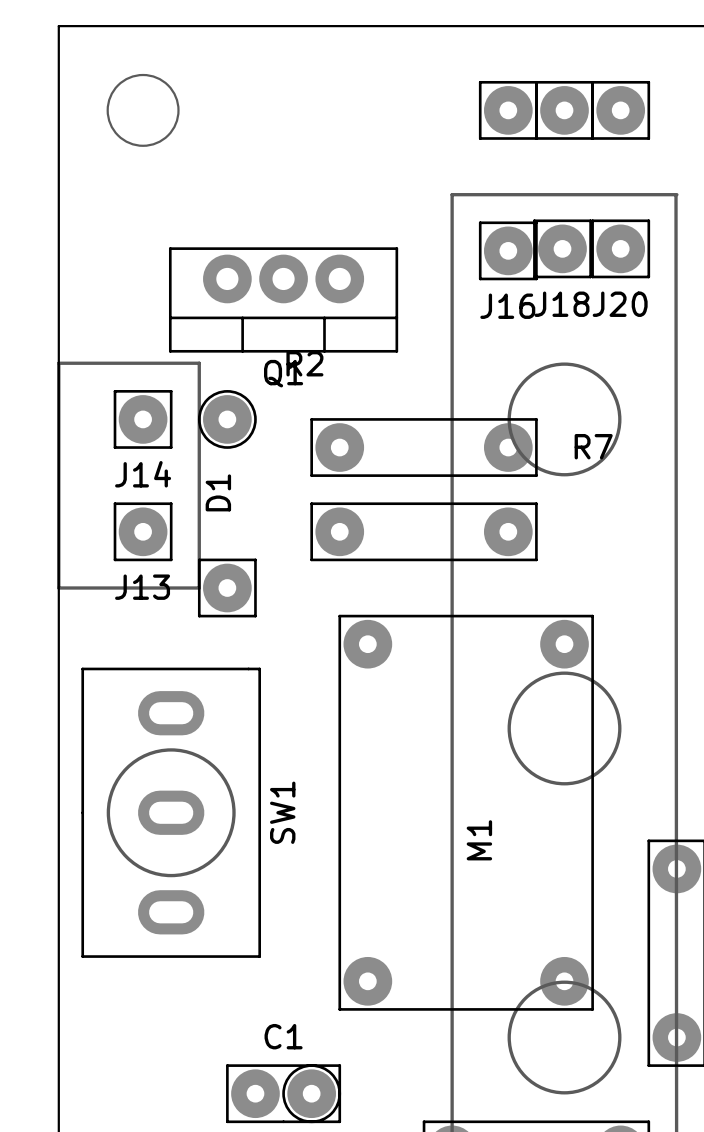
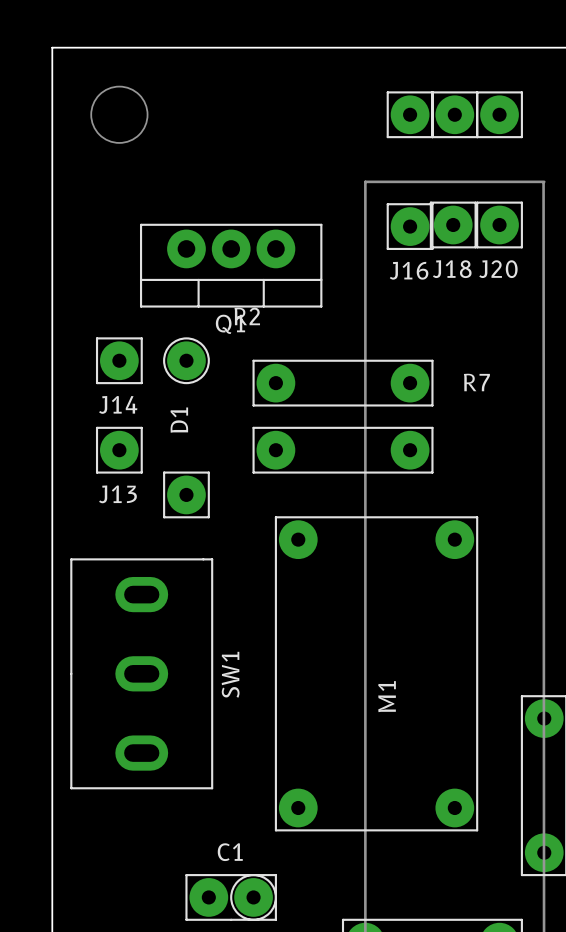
drawing: [507, 362, 622, 477] -> none
line: (58, 363) (199, 363) (199, 588) (58, 588) (58, 363) -> none
drawing: [507, 671, 622, 786] -> none
drawing: [106, 748, 236, 878] -> none
drawing: [507, 980, 622, 1095] -> none

